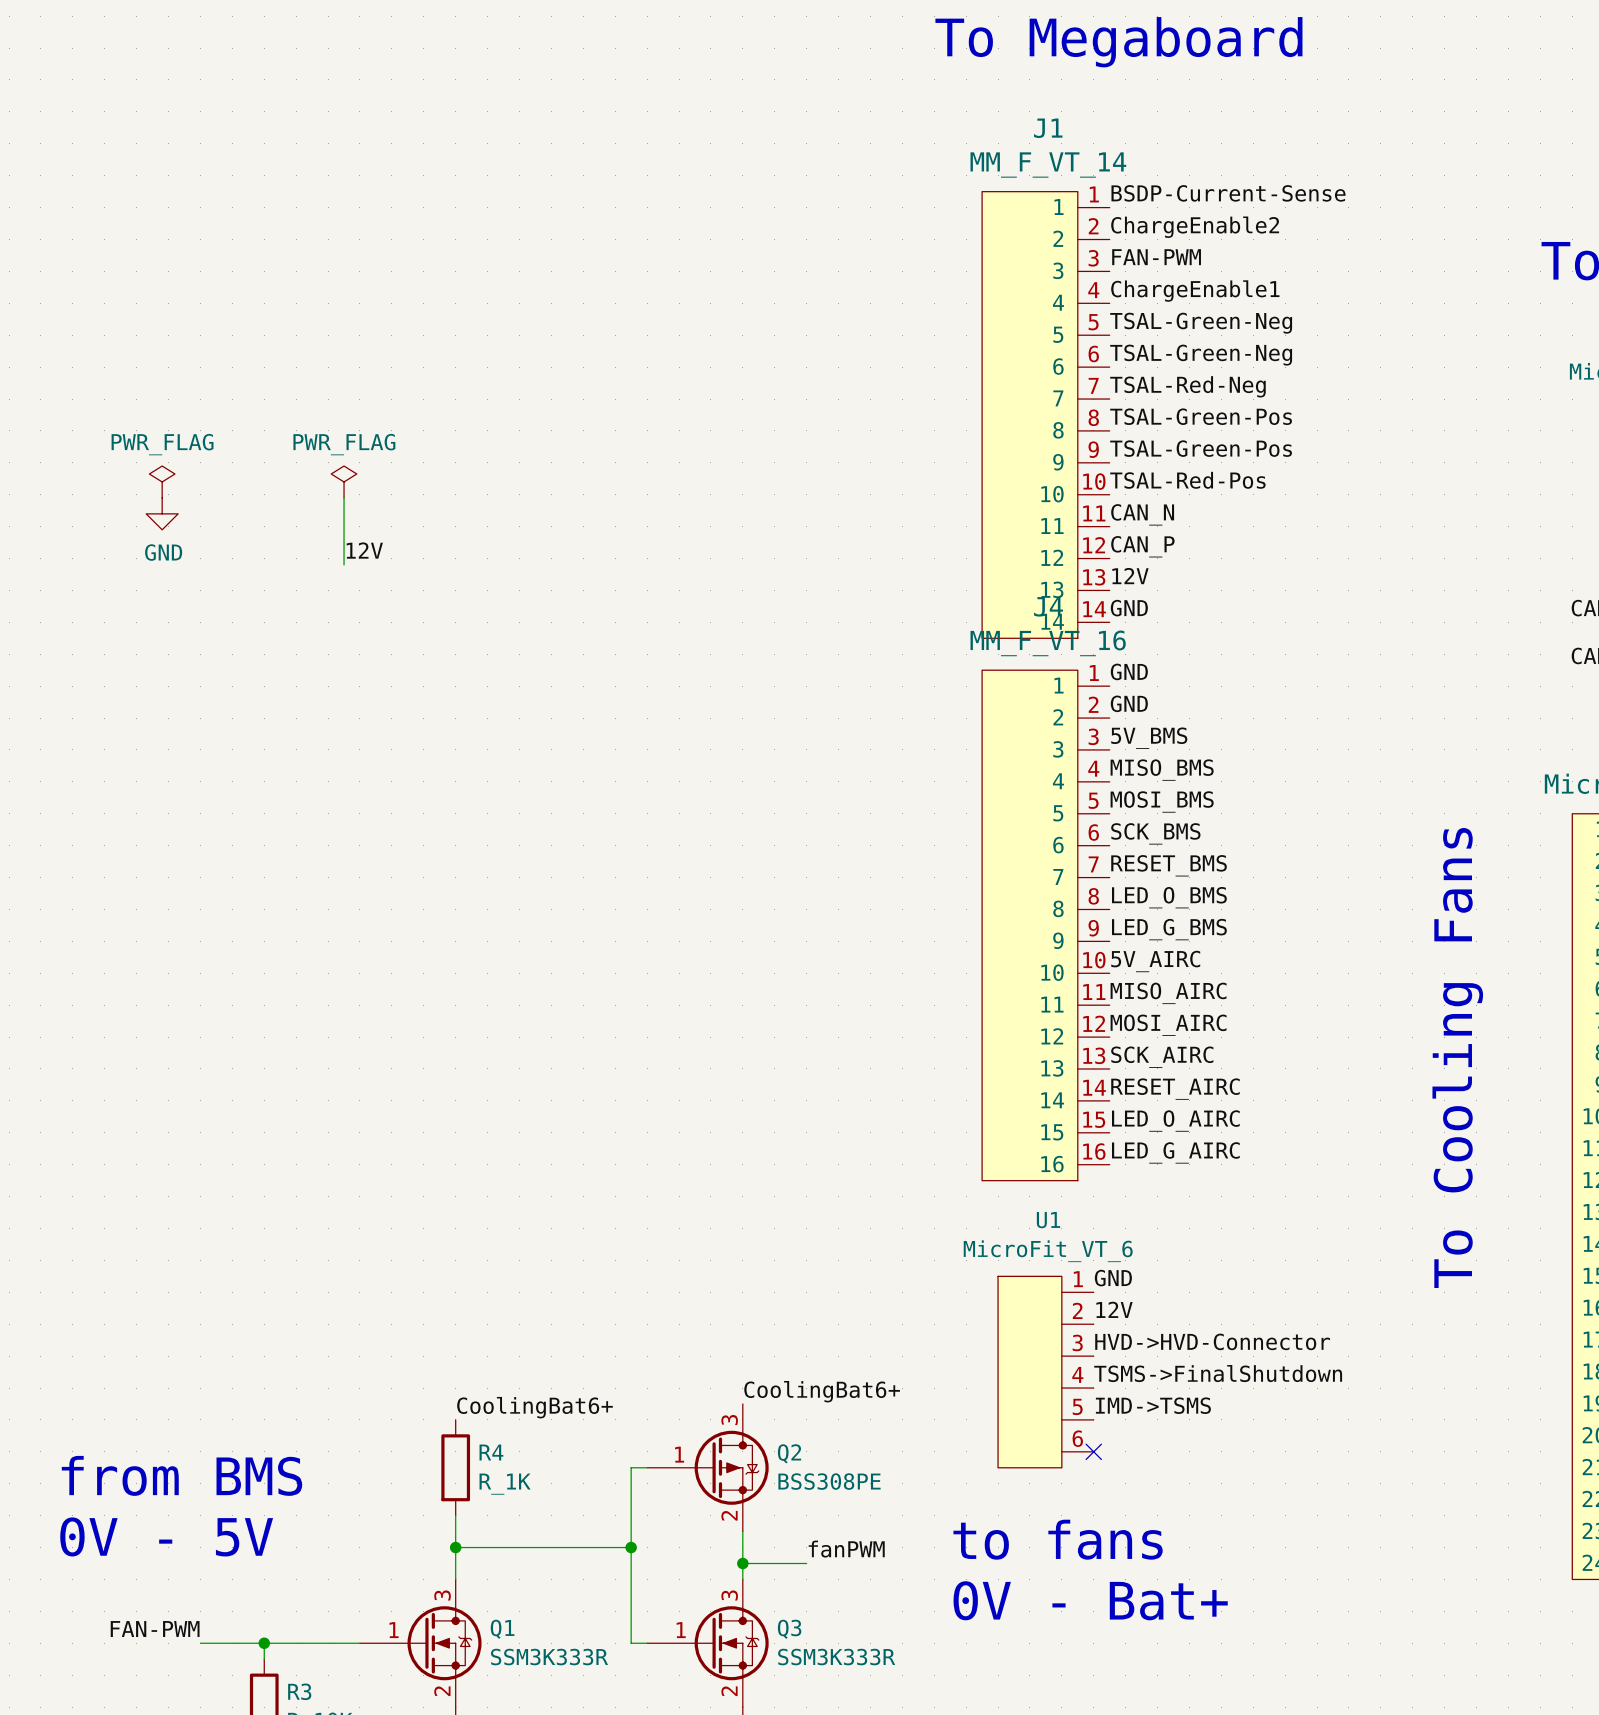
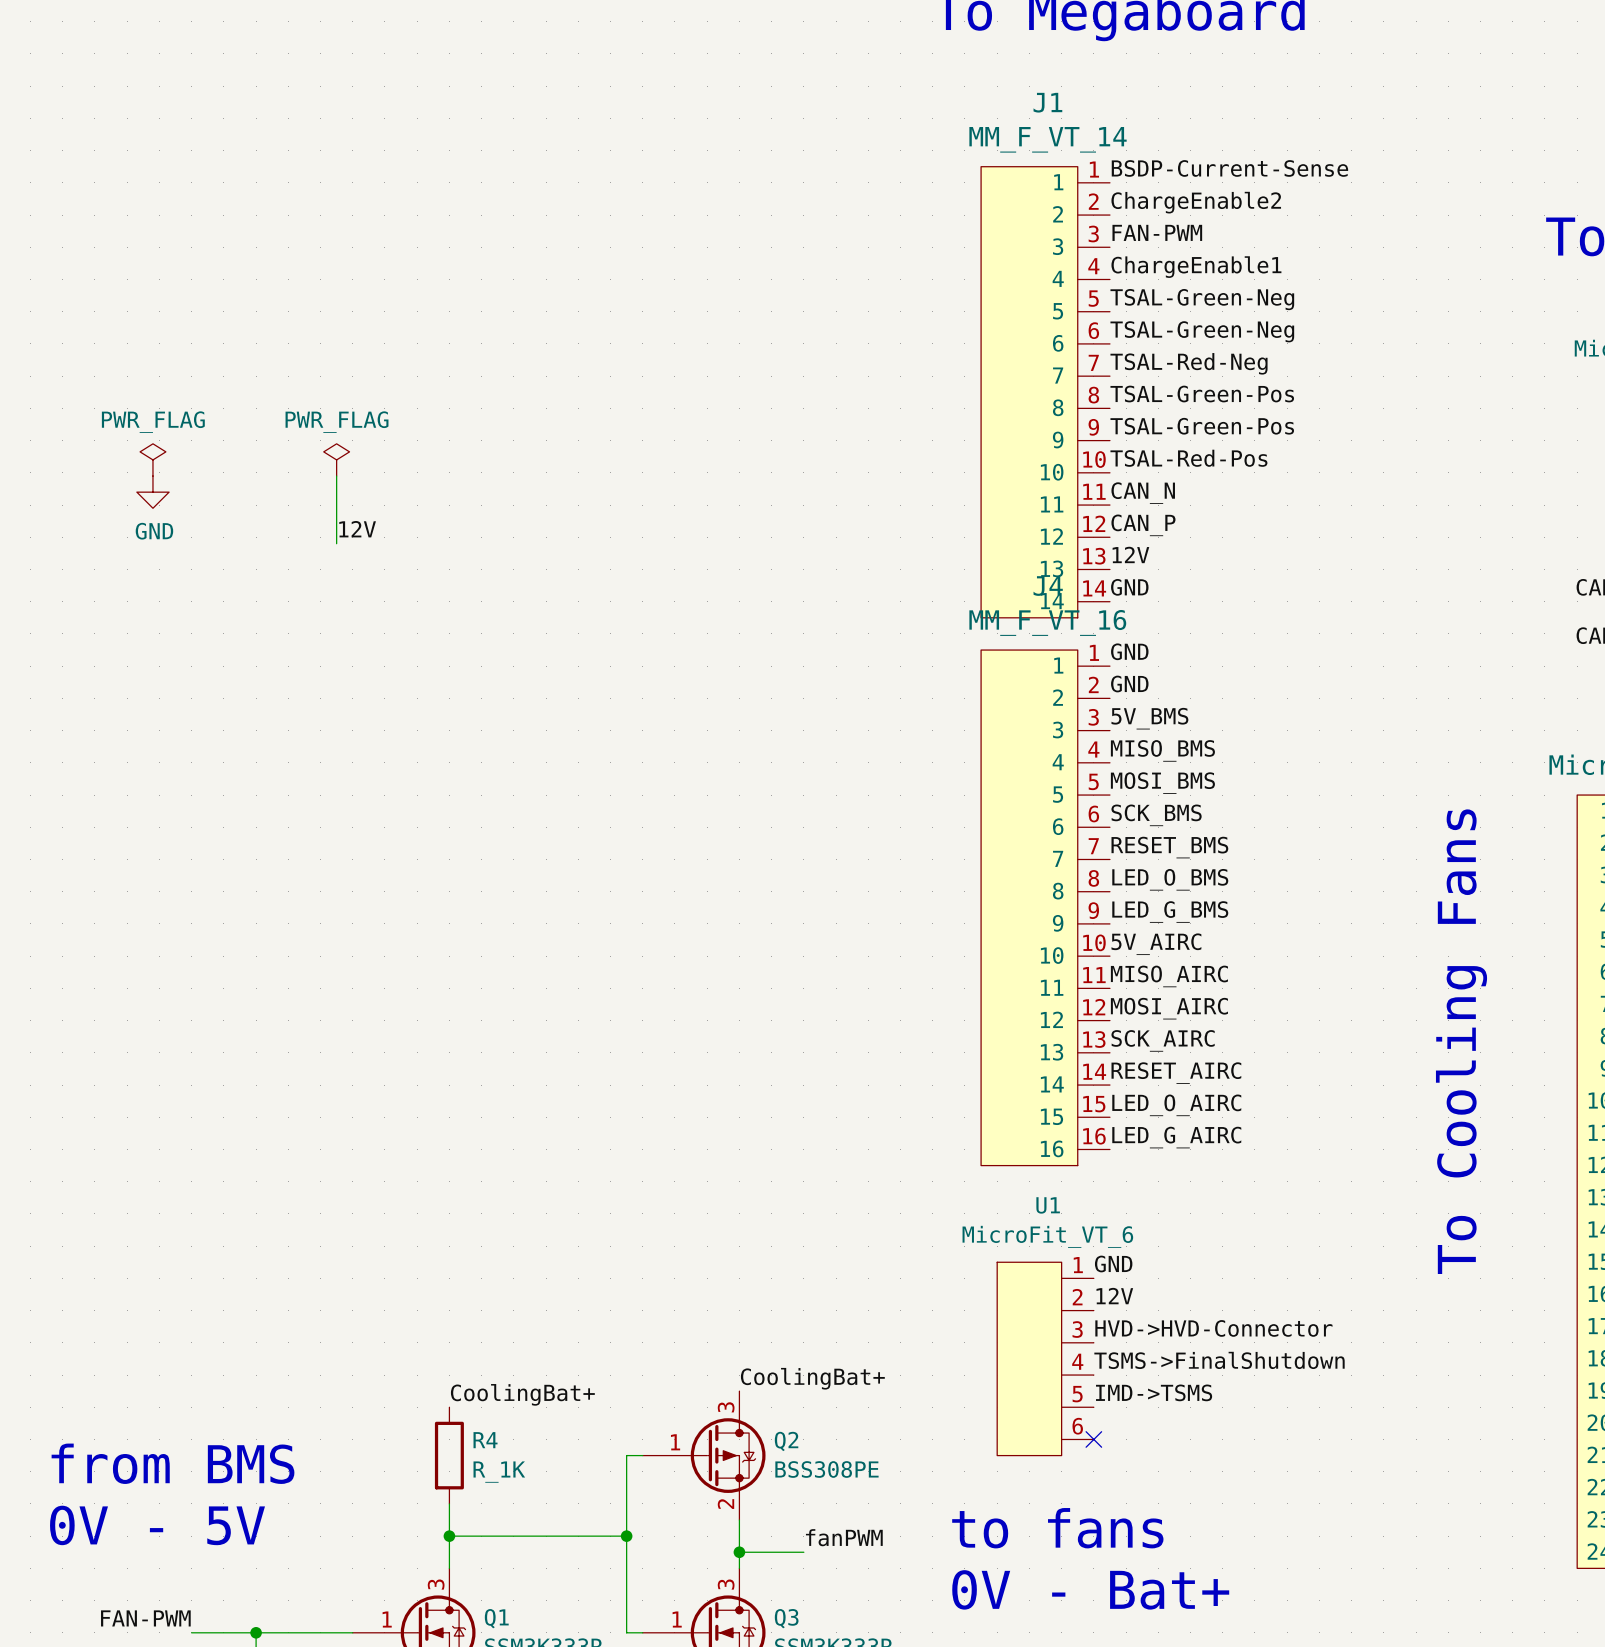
label: CoolingBat6+ (822, 1391) -> CoolingBat+ (812, 1378)
label: CoolingBat6+ (534, 1407) -> CoolingBat+ (522, 1394)

